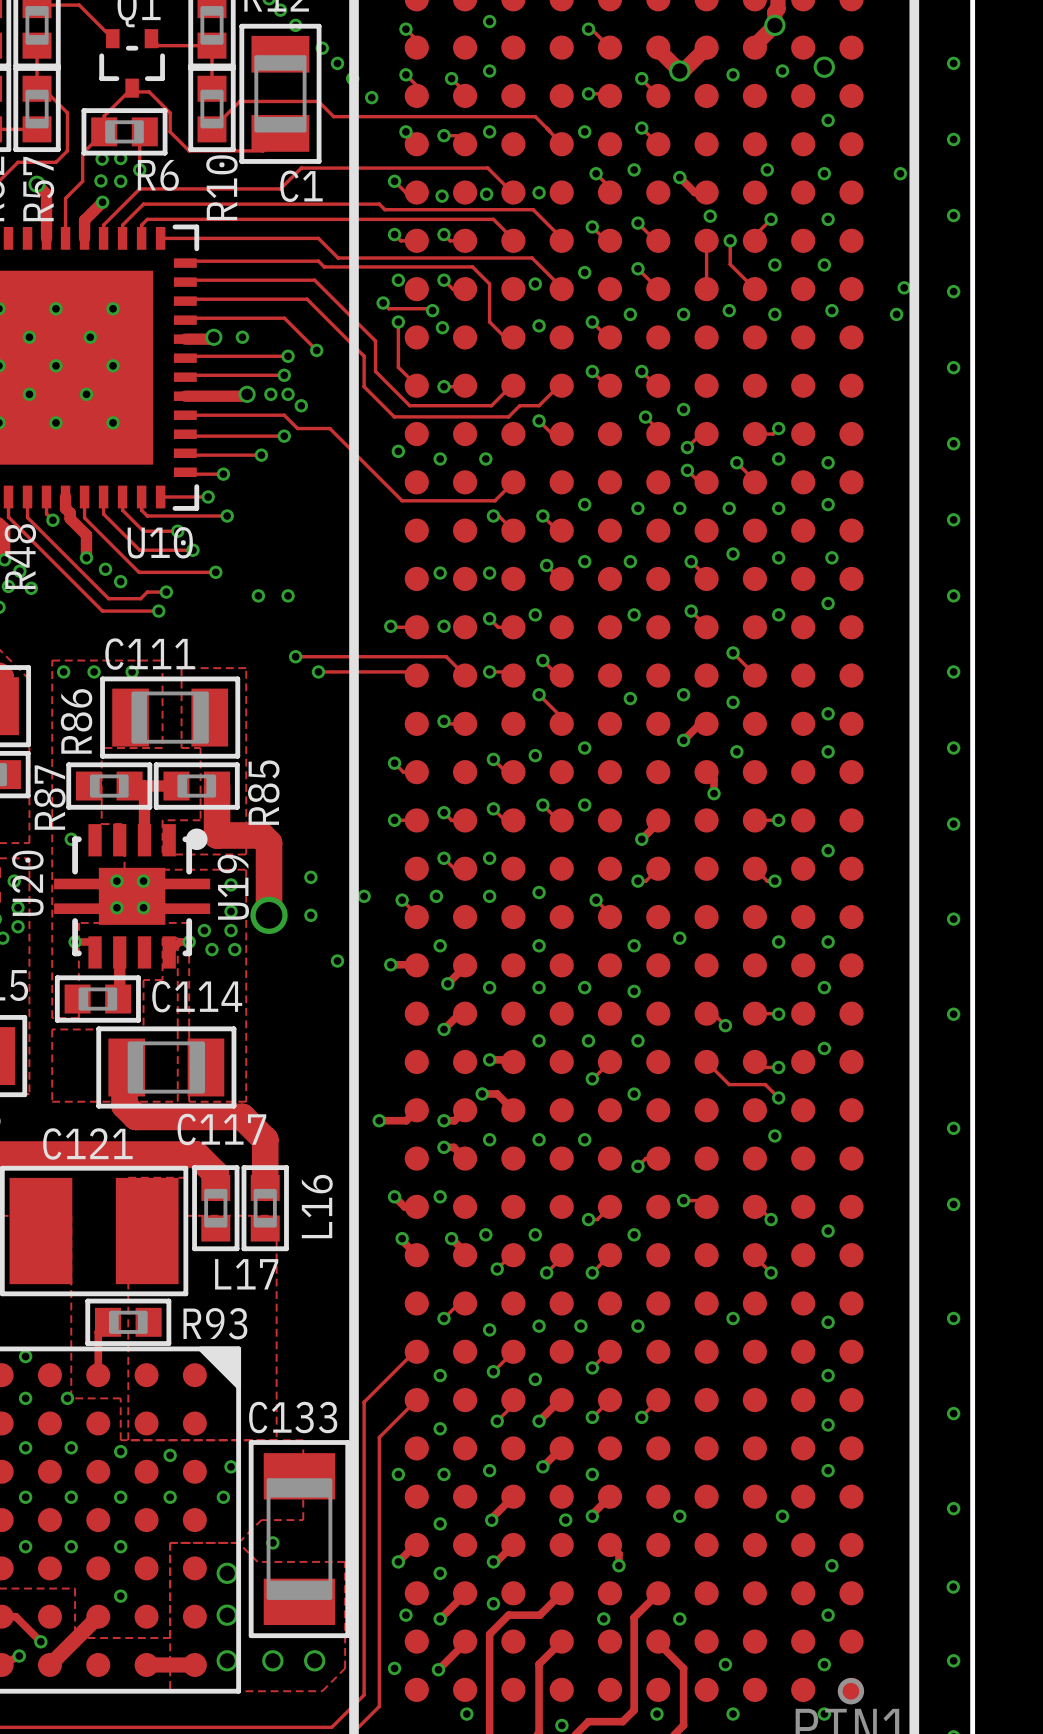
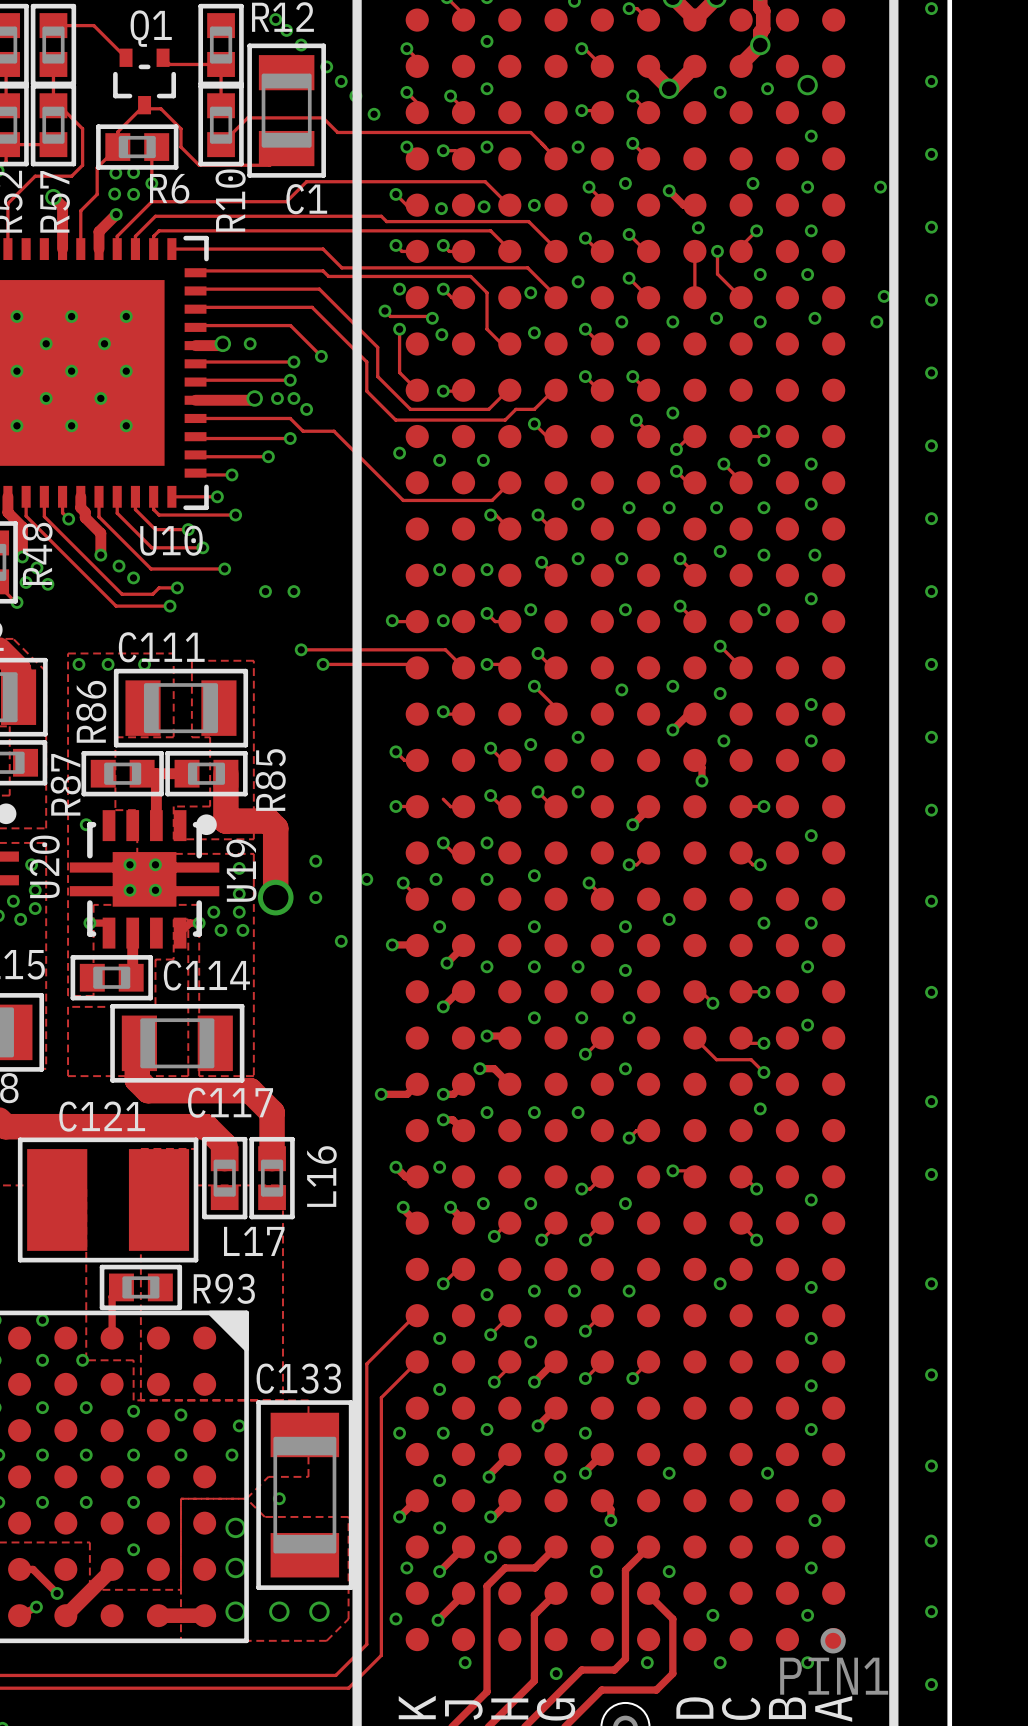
via: (443, 812) -> none

